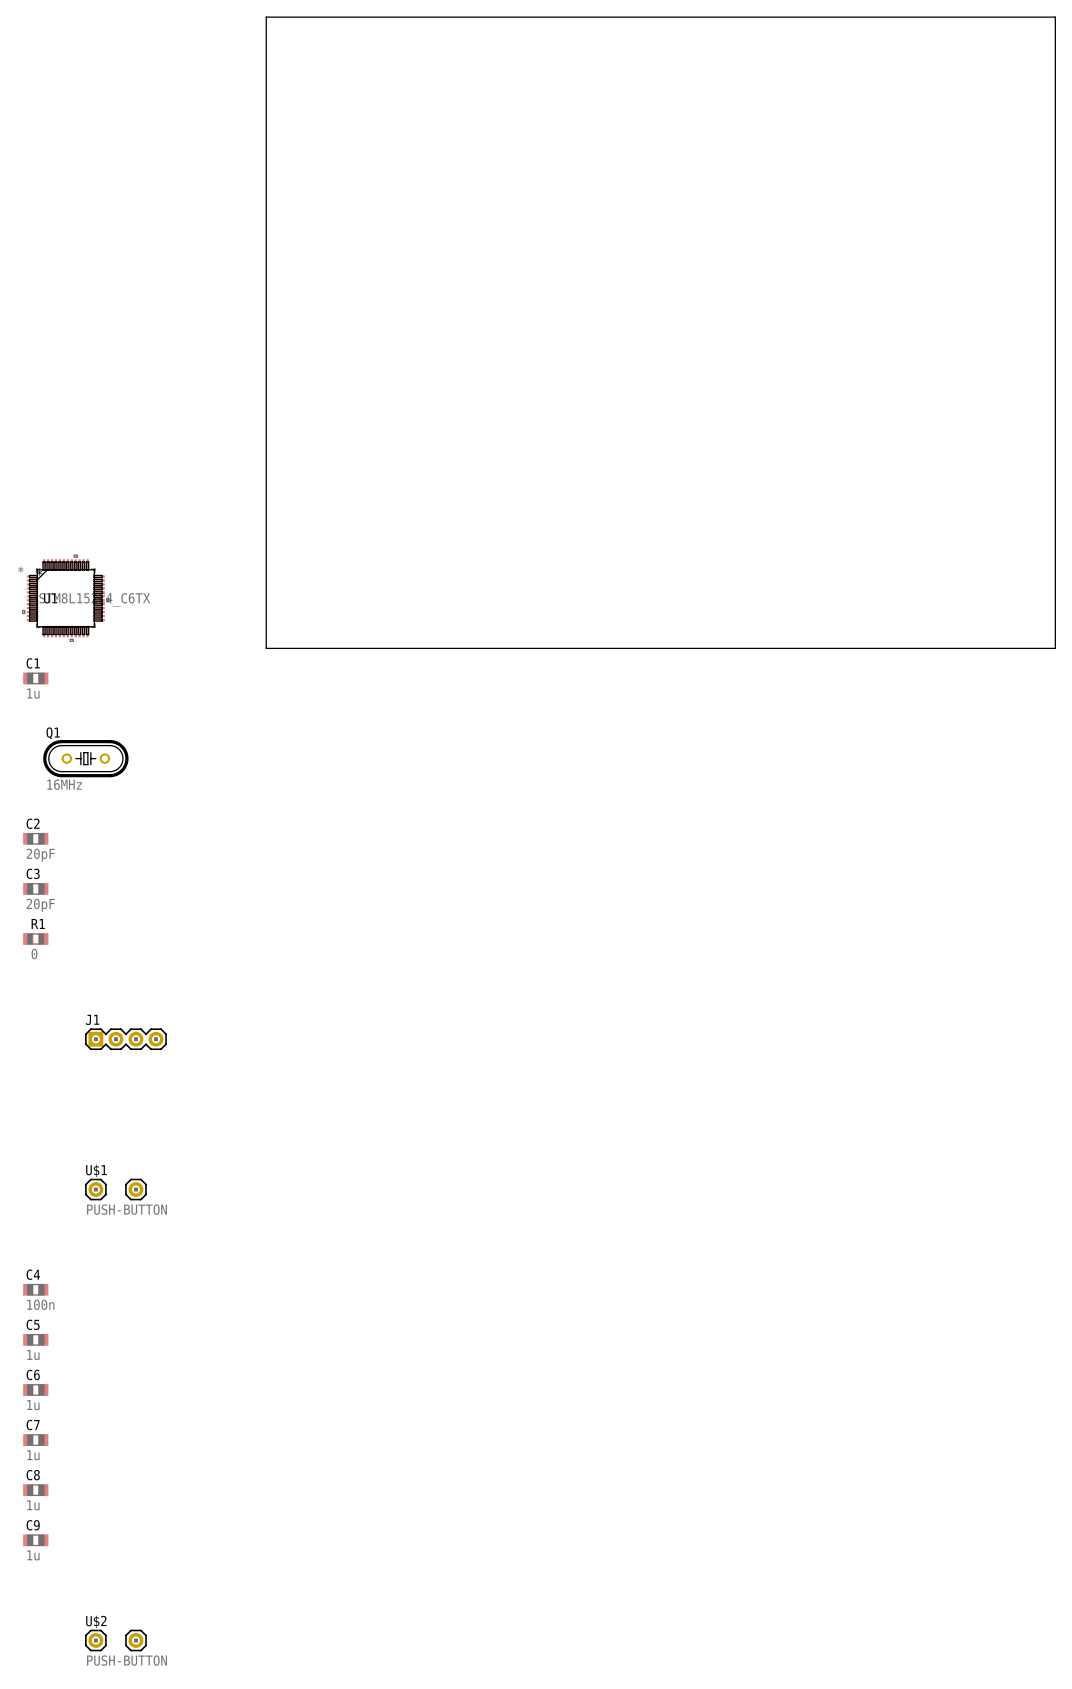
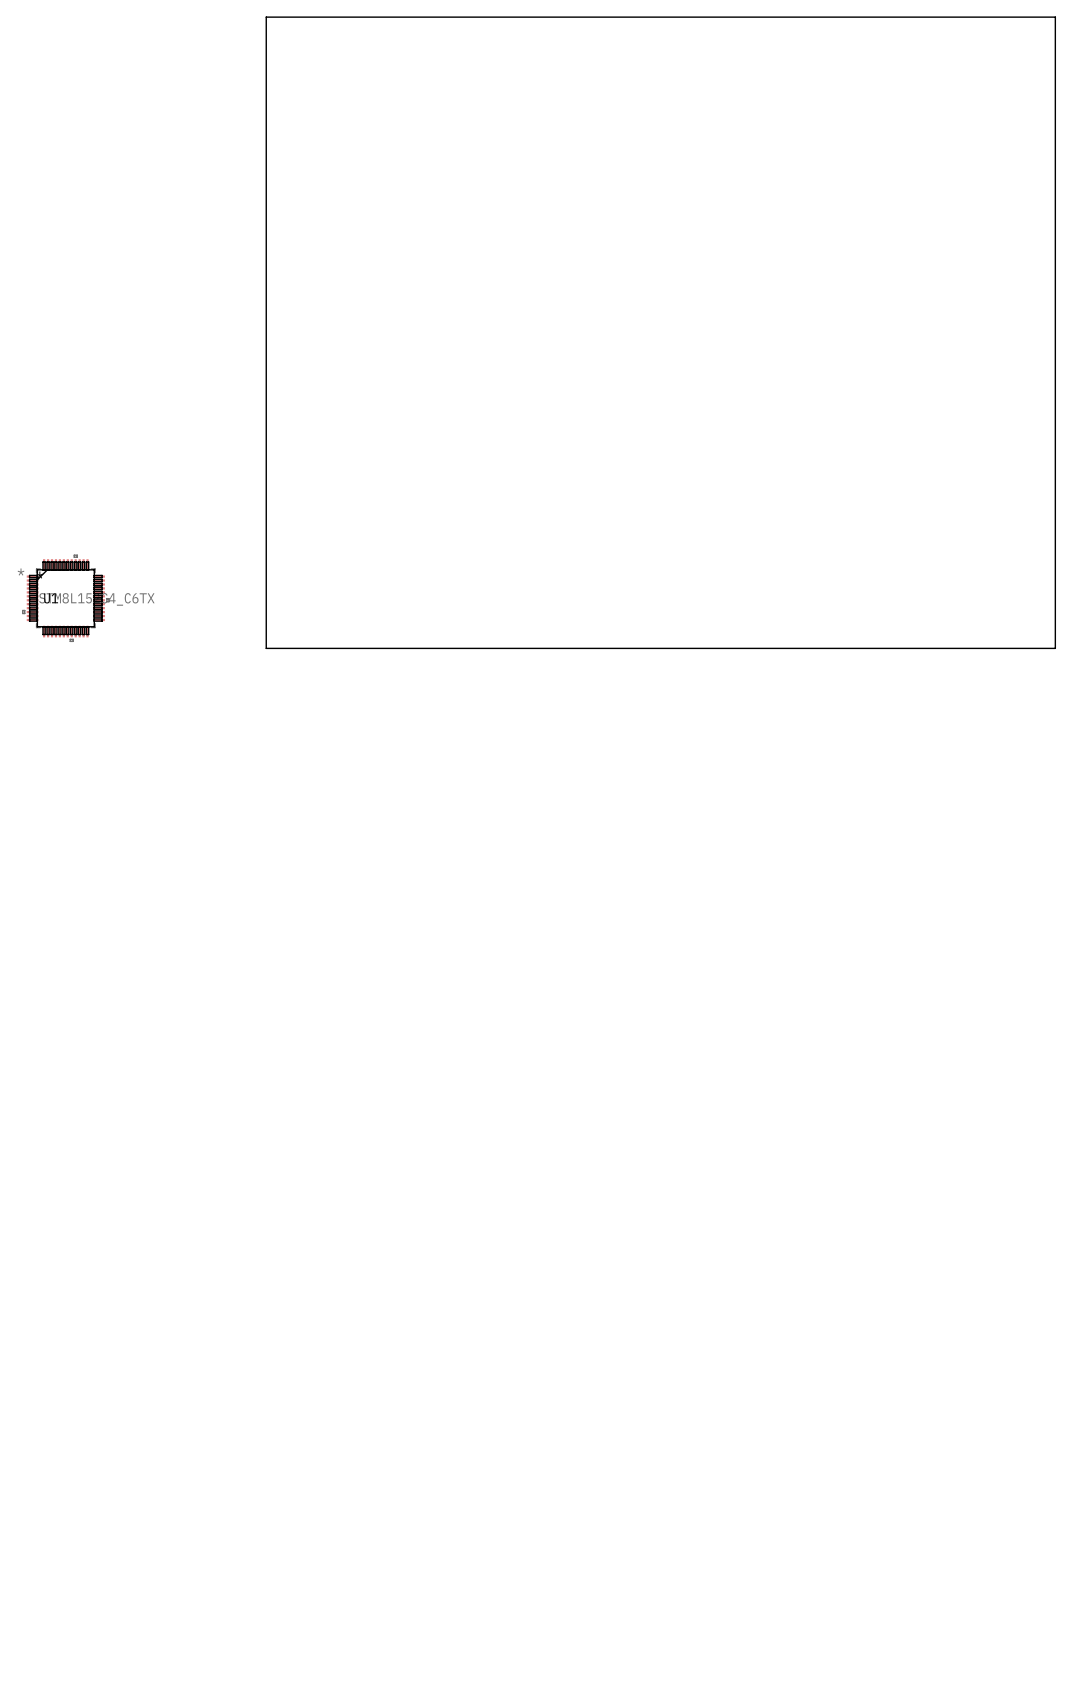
C1: 1u (35, 678) -> none
Q1: 16MHz (85, 758) -> none
C2: 20pF (35, 838) -> none
C3: 20pF (35, 888) -> none
R1: 0 (35, 939) -> none
J1: (125, 1039) -> none
U$1: PUSH-BUTTON (115, 1189) -> none
C4: 100n (35, 1289) -> none
C5: 1u (35, 1339) -> none
C6: 1u (35, 1389) -> none
C7: 1u (35, 1440) -> none
C8: 1u (35, 1490) -> none
C9: 1u (35, 1540) -> none
U$2: PUSH-BUTTON (115, 1640) -> none

